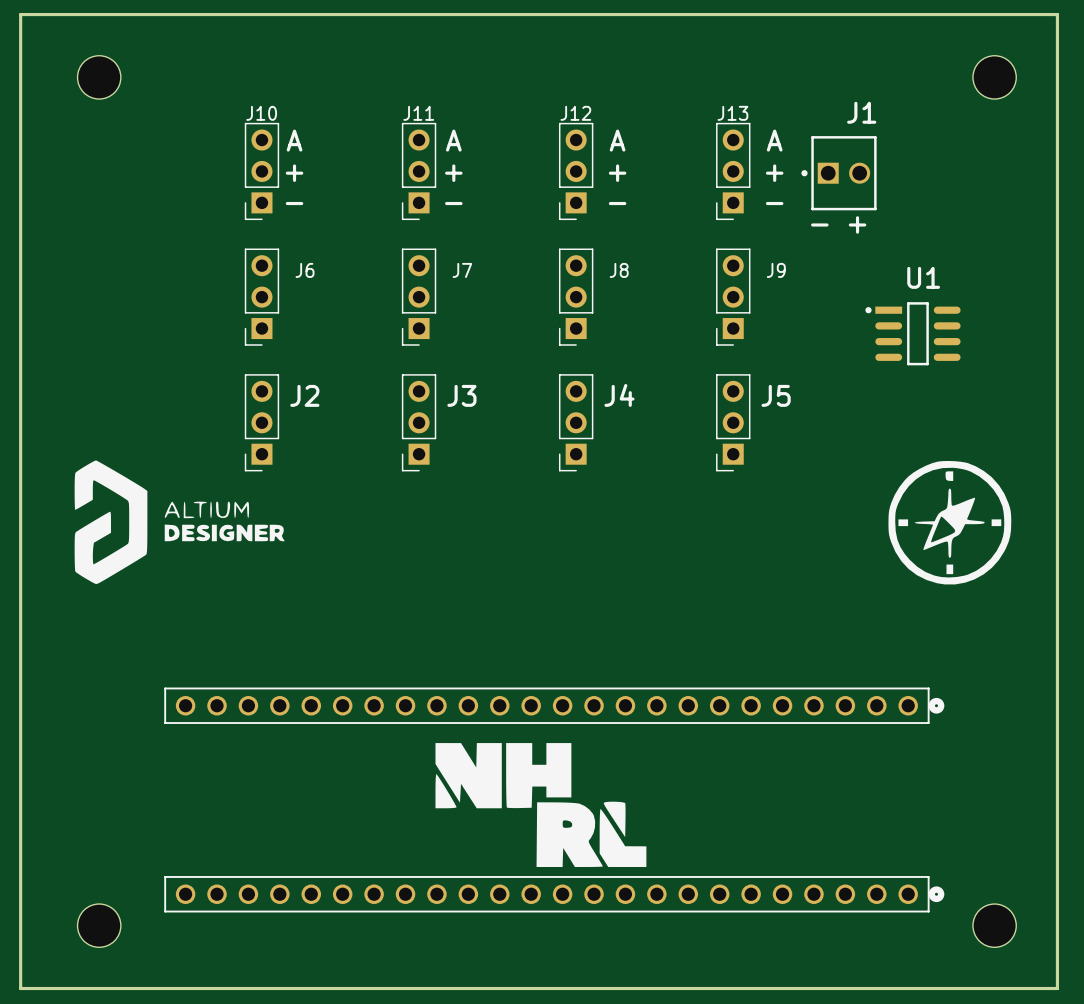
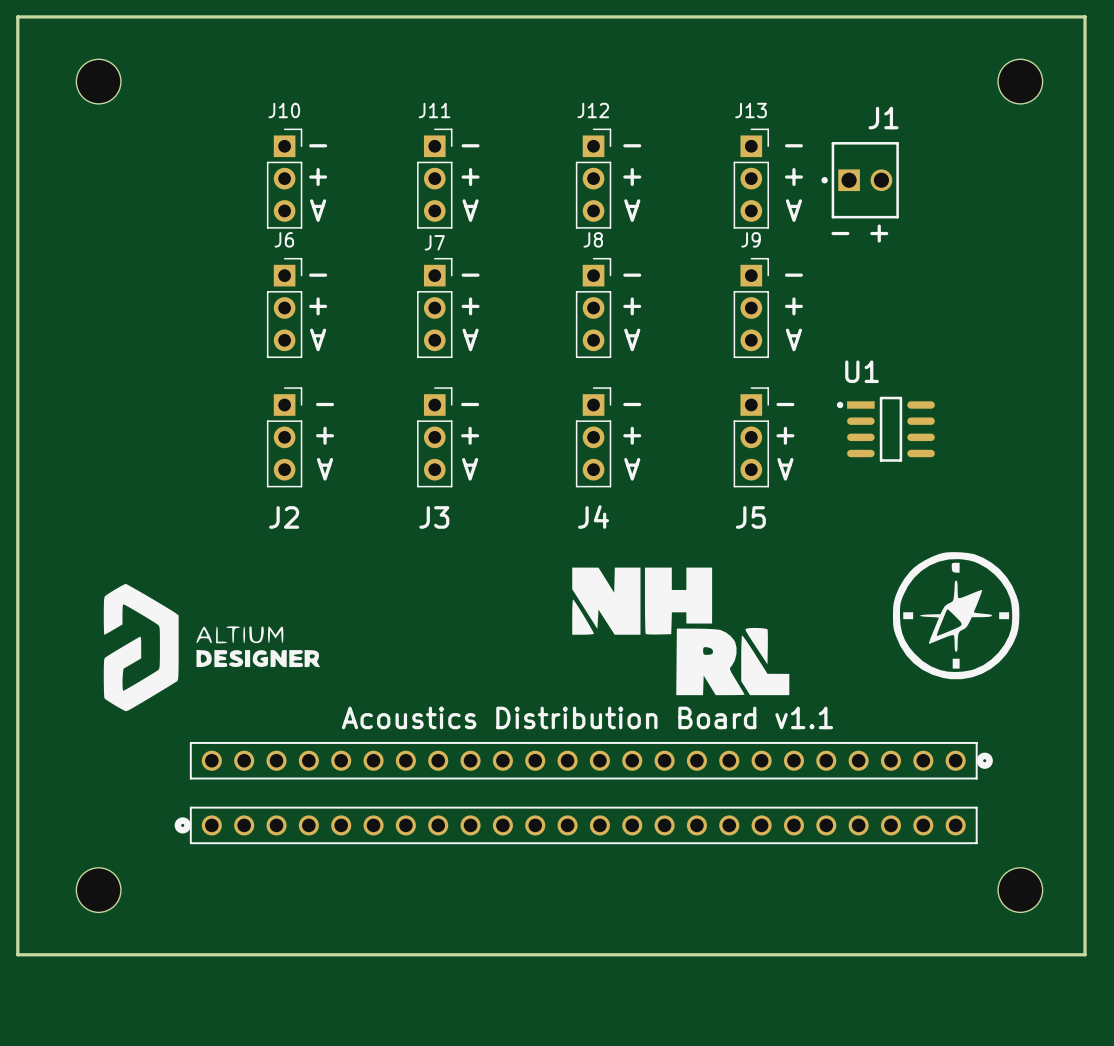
text: none -> - (318, 145)
text: none -> - (470, 145)
text rotation: 0° (294, 140) -> 180° (318, 210)
text position: A (294, 140) -> A (318, 210)
text rotation: 0° (453, 140) -> 180° (470, 210)
text position: A (453, 140) -> A (470, 210)
text: A (617, 140) -> - (632, 145)
text: A (774, 140) -> - (793, 145)
J10 rotation: 0° (261, 171) -> 180° (284, 178)
J11 rotation: 0° (419, 171) -> 180° (434, 178)
J12 rotation: 0° (576, 171) -> 180° (593, 178)
J13 rotation: 0° (733, 171) -> 180° (751, 178)
text rotation: 0° (294, 173) -> 180° (318, 177)
text rotation: 0° (453, 173) -> 180° (470, 177)
text rotation: 0° (617, 173) -> 180° (632, 177)
text rotation: 0° (774, 173) -> 180° (793, 177)
text: - (294, 203) -> none
text: - (453, 203) -> none
text: - (617, 203) -> A (632, 210)
text: - (774, 203) -> A (793, 210)
text: none -> - (318, 275)
text: none -> - (470, 275)
text: none -> - (632, 275)
text: none -> - (793, 275)
J6 name position: J6 (305, 270) -> J6 (284, 239)
J7 name position: J7 (462, 270) -> J7 (434, 242)
J8 name position: J8 (619, 270) -> J8 (593, 239)
J9 name position: J9 (776, 270) -> J9 (751, 239)
U1 name position: U1 (923, 277) -> U1 (862, 371)
text: none -> + (318, 306)
text: none -> + (470, 306)
text: none -> + (632, 306)
text: none -> + (793, 306)
J6 rotation: 0° (261, 297) -> 180° (284, 307)
J7 rotation: 0° (419, 297) -> 180° (434, 307)
J8 rotation: 0° (576, 297) -> 180° (593, 307)
J9 rotation: 0° (733, 297) -> 180° (751, 307)
text: none -> A (318, 339)
text: none -> A (470, 339)
text: none -> A (632, 339)
text: none -> A (793, 339)
U1 position: (913, 333) -> (885, 429)
text: none -> - (325, 404)
text: none -> - (470, 404)
text: none -> - (632, 404)
text: none -> - (785, 404)
J2 name position: J2 (304, 395) -> J2 (284, 517)
J3 name position: J3 (461, 395) -> J3 (434, 517)
J4 name position: J4 (619, 395) -> J4 (593, 517)
J5 name position: J5 (776, 395) -> J5 (750, 517)
text: none -> + (325, 435)
text: none -> + (470, 435)
text: none -> + (632, 435)
text: none -> + (785, 435)
J2 rotation: 0° (261, 422) -> 180° (284, 437)
J3 rotation: 0° (419, 422) -> 180° (434, 437)
J4 rotation: 0° (576, 422) -> 180° (593, 437)
J5 rotation: 0° (733, 422) -> 180° (751, 437)
text: none -> A (325, 469)
text: none -> A (470, 469)
text: none -> A (632, 469)
text: none -> A (785, 469)
drawing position: (179, 522) -> (211, 647)
drawing position: (949, 522) -> (956, 615)
text: none -> Acoustics Distribution Board v1.1 (587, 717)
part position: (554, 705) -> (591, 760)
part: none -> (576, 825)
drawing position: (540, 805) -> (680, 631)
part: (554, 894) -> none
board edge: (20, 925) (20, 988) (1057, 988) (1057, 925) -> (17, 954) (1085, 954)
part position: (99, 925) -> (98, 890)
part position: (994, 925) -> (1020, 890)

